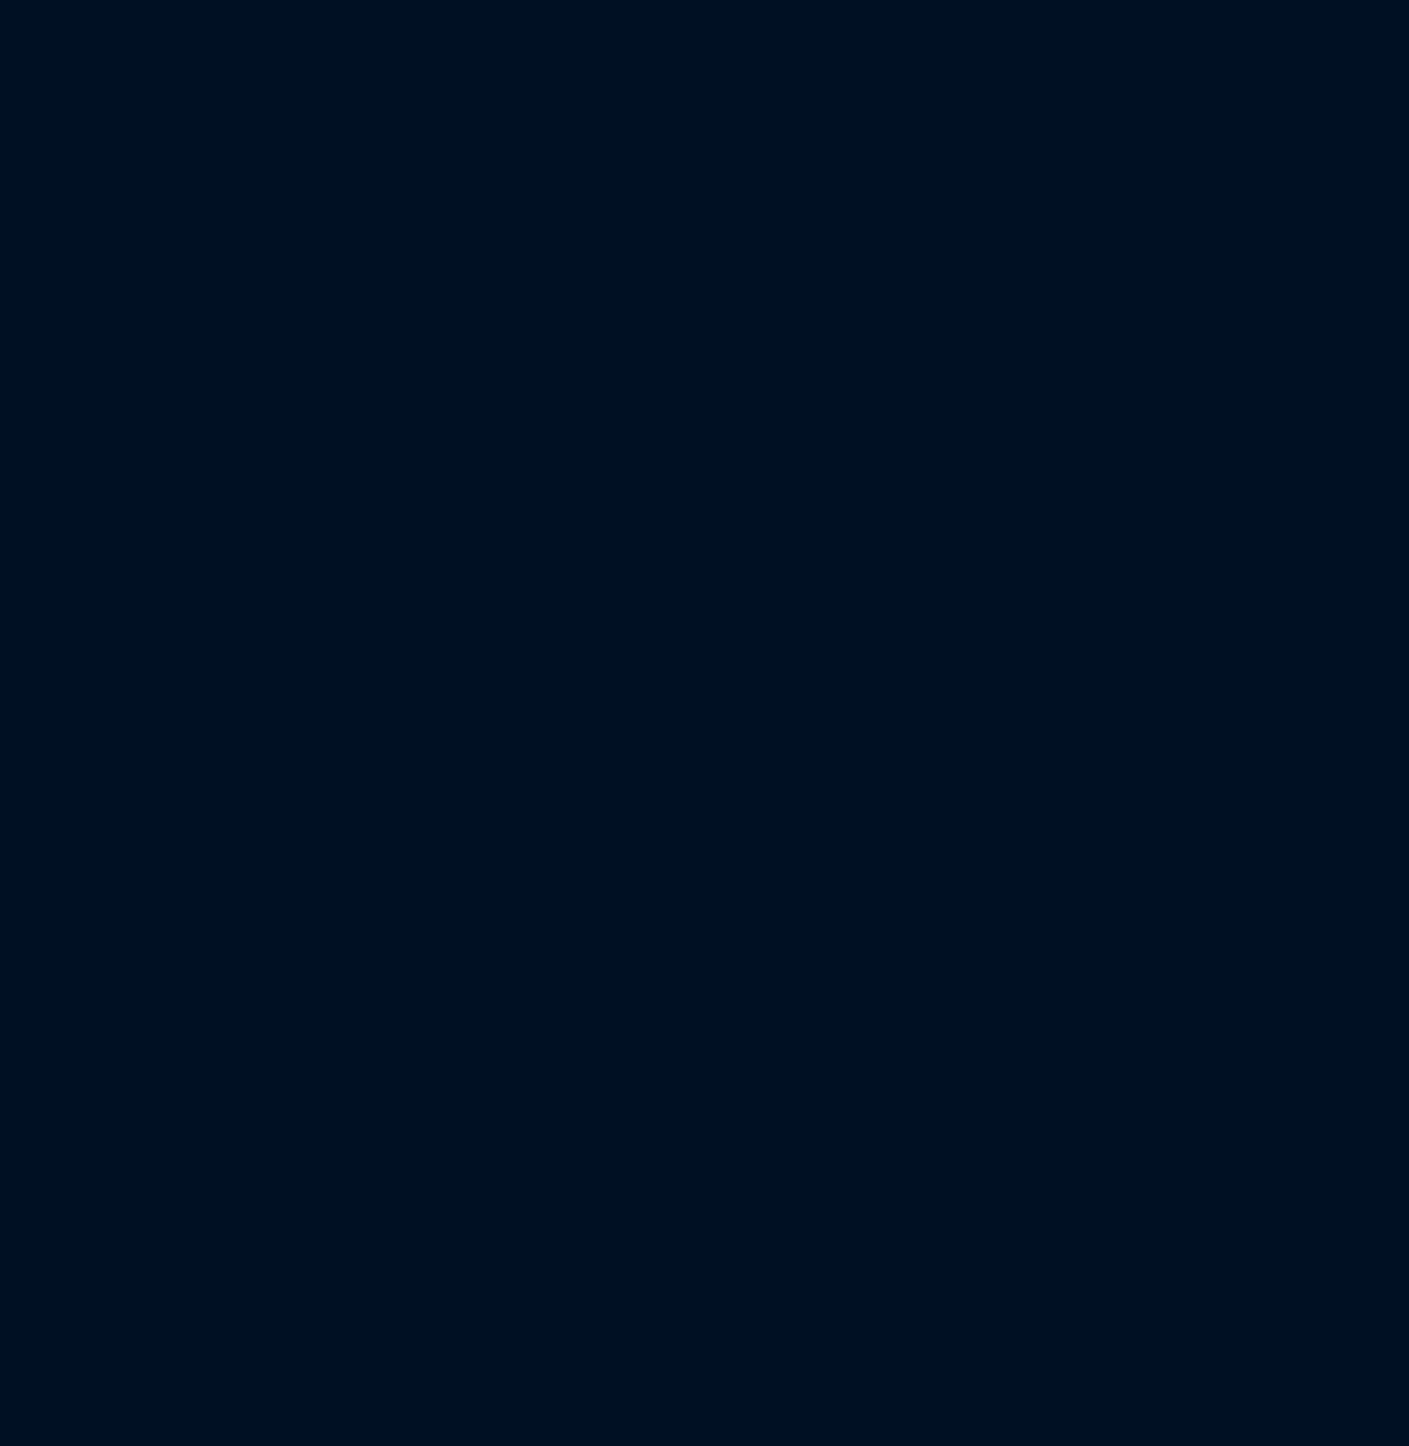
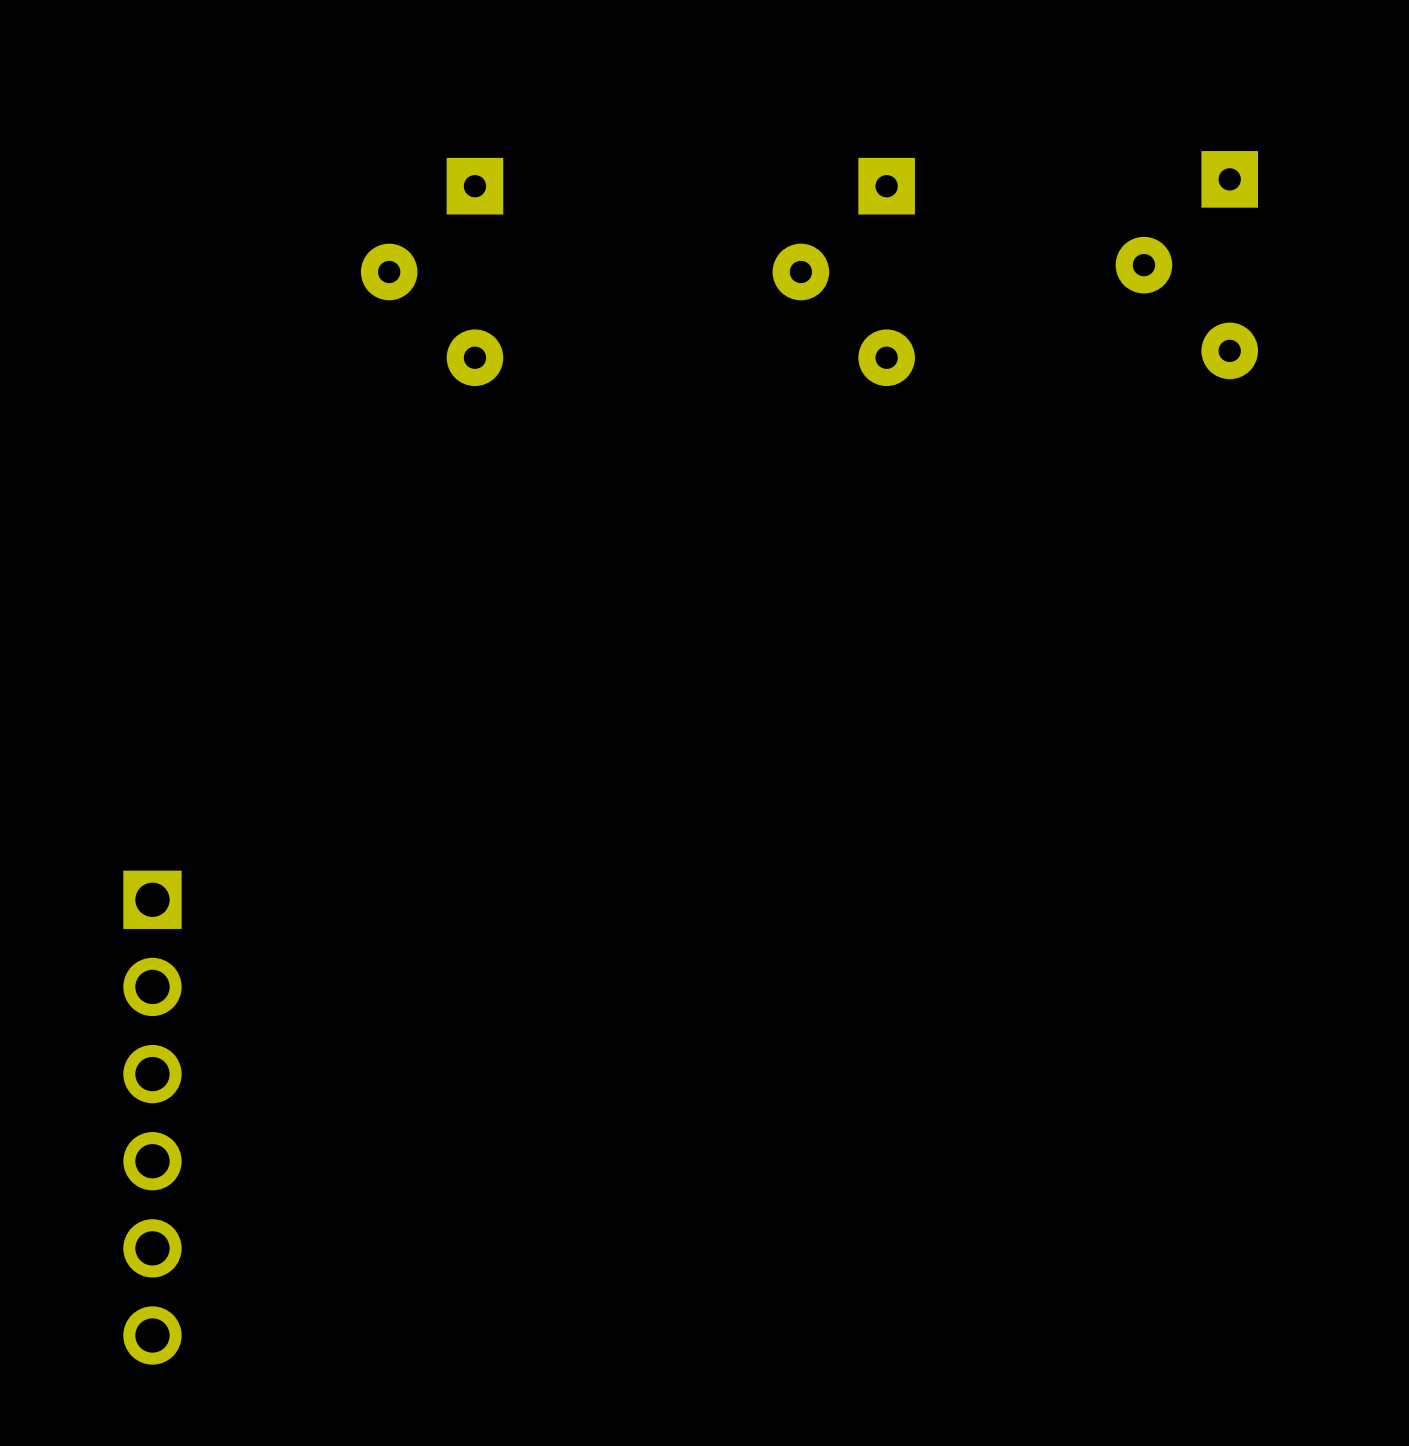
part: none -> (1186, 265)
part: none -> (432, 271)
part: none -> (843, 271)
part: none -> (152, 1117)

